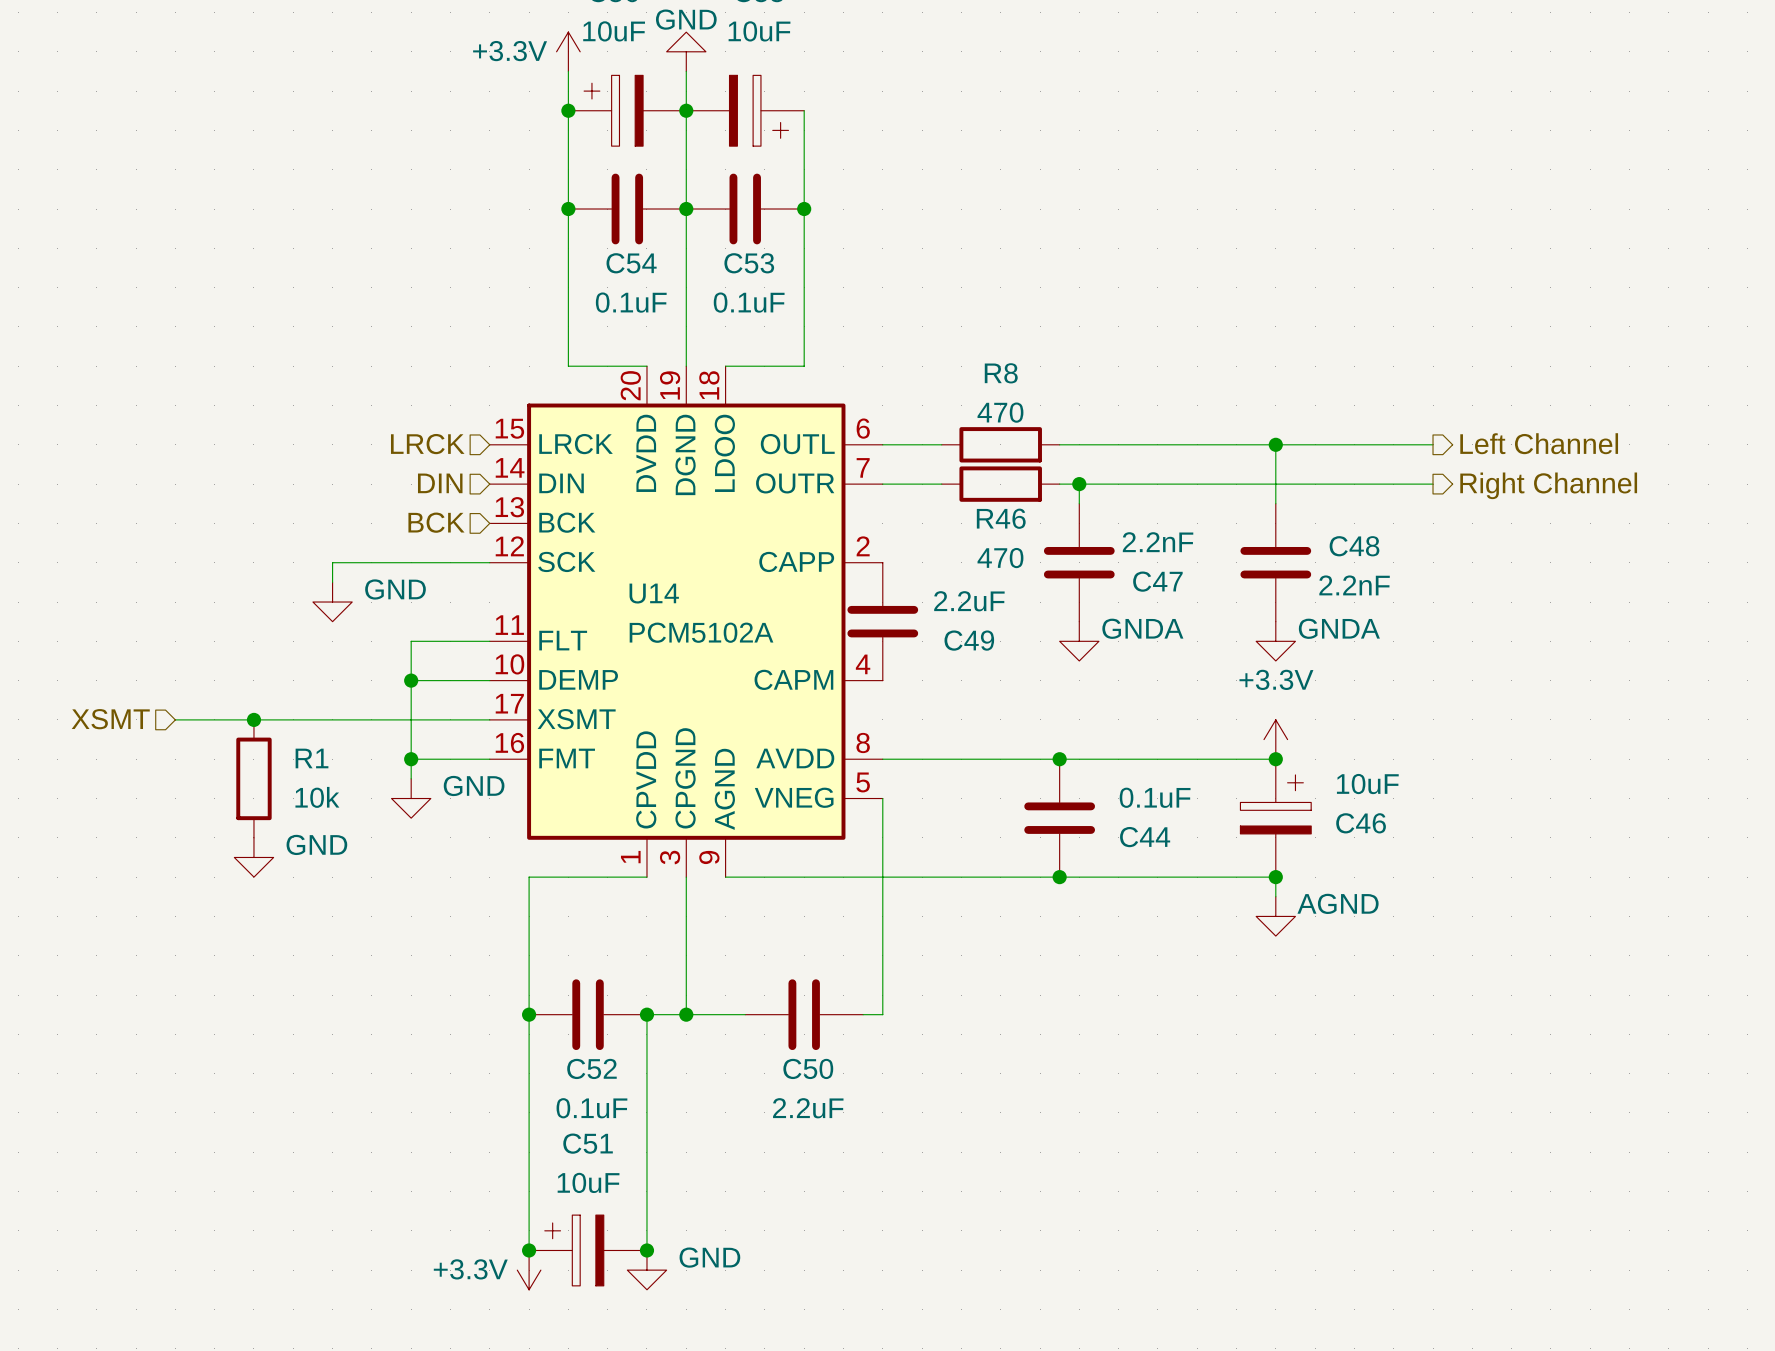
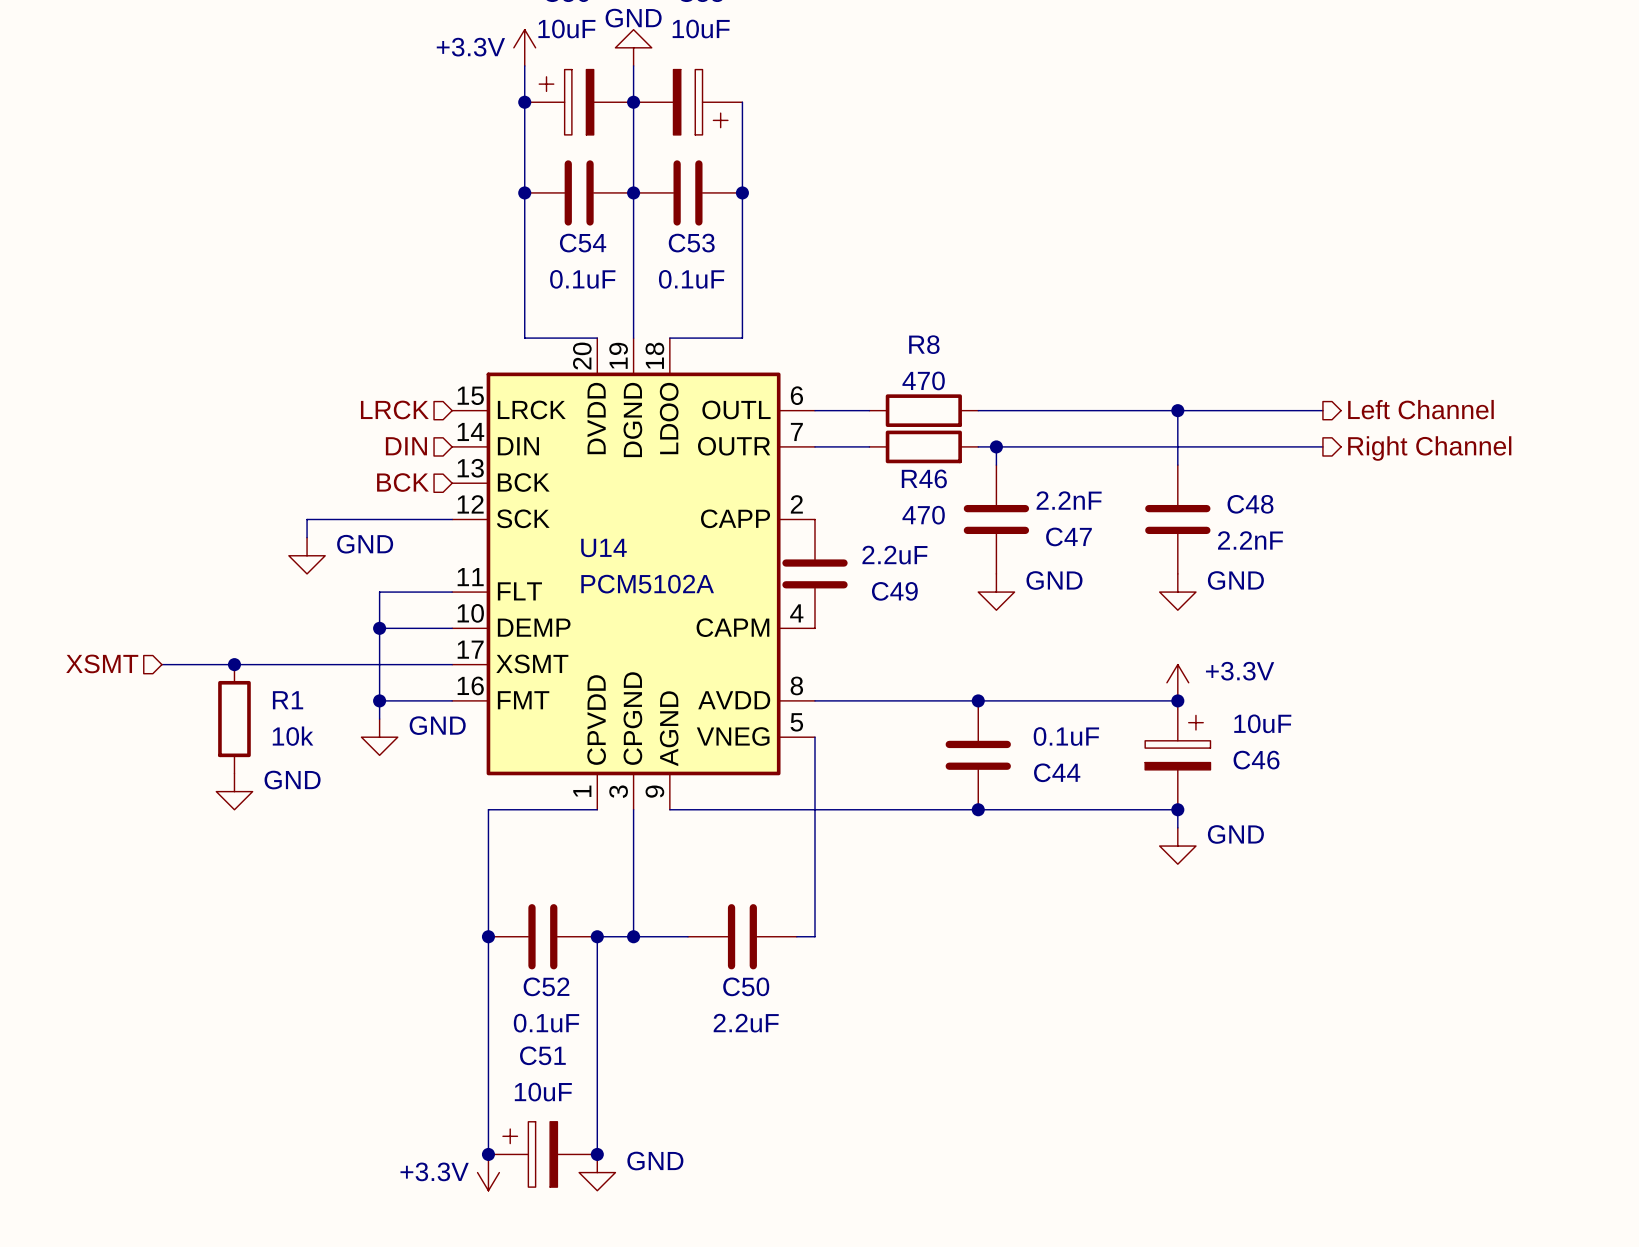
power symbol: GNDA (1079, 641) -> GND (996, 592)
power symbol: GNDA (1275, 641) -> GND (1177, 592)
power symbol text position: +3.3V (1276, 679) -> +3.3V (1240, 671)
power symbol: AGND (1275, 916) -> GND (1177, 846)

